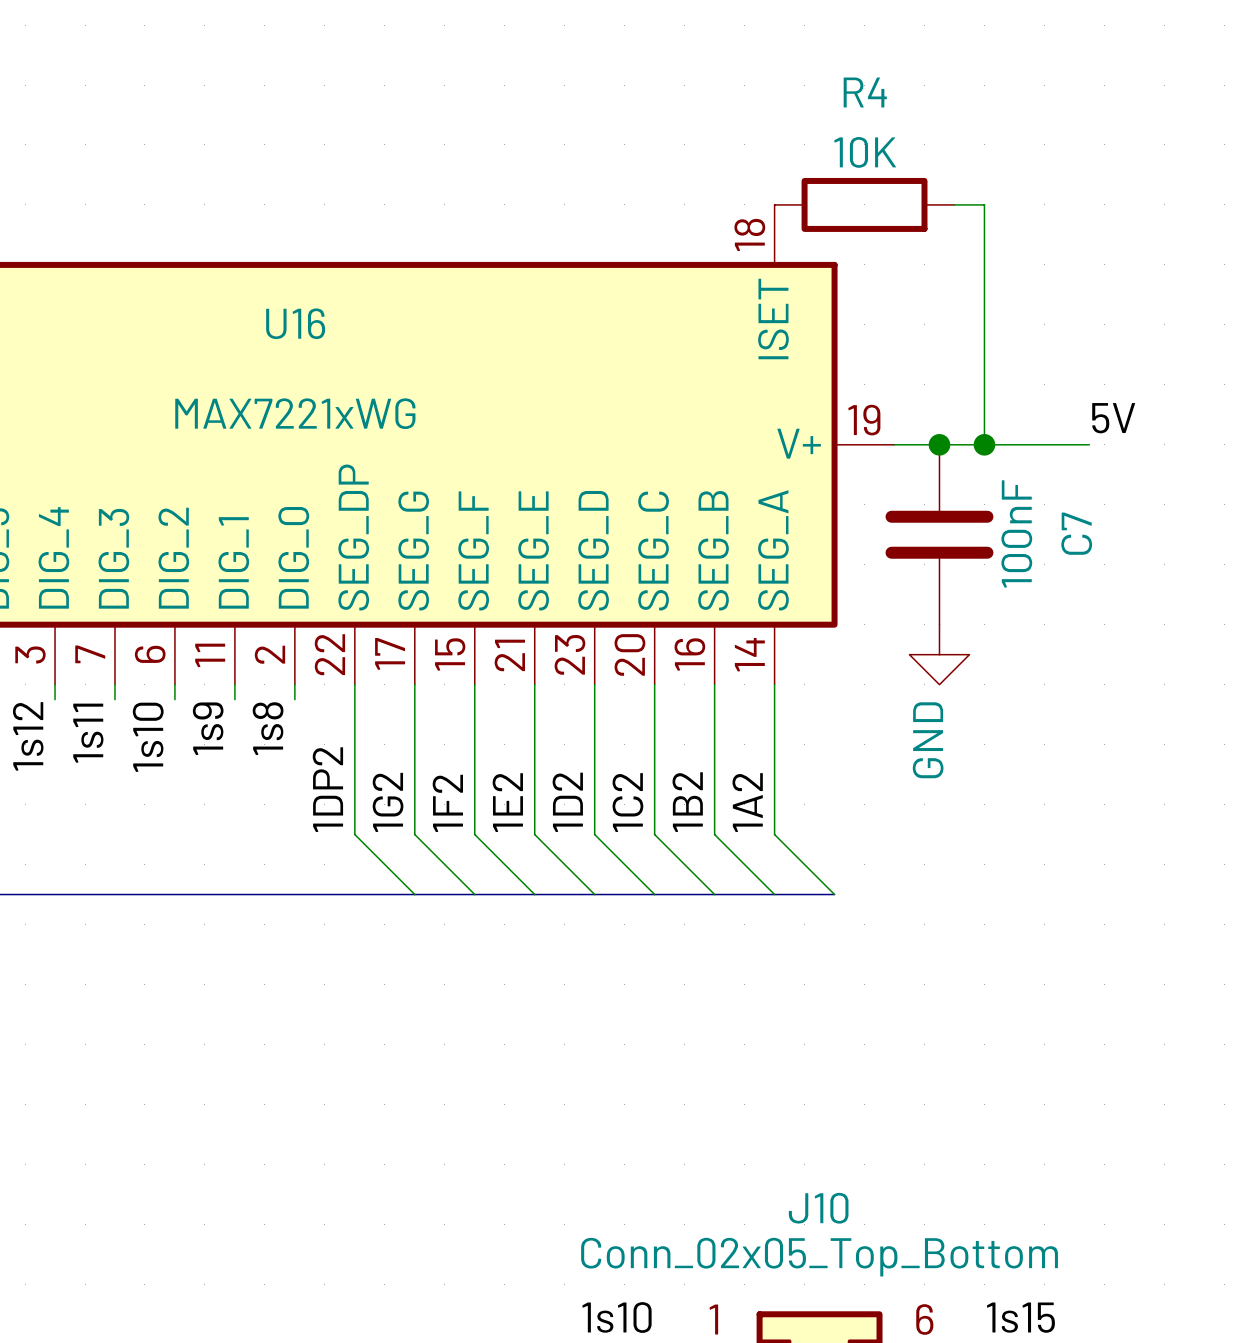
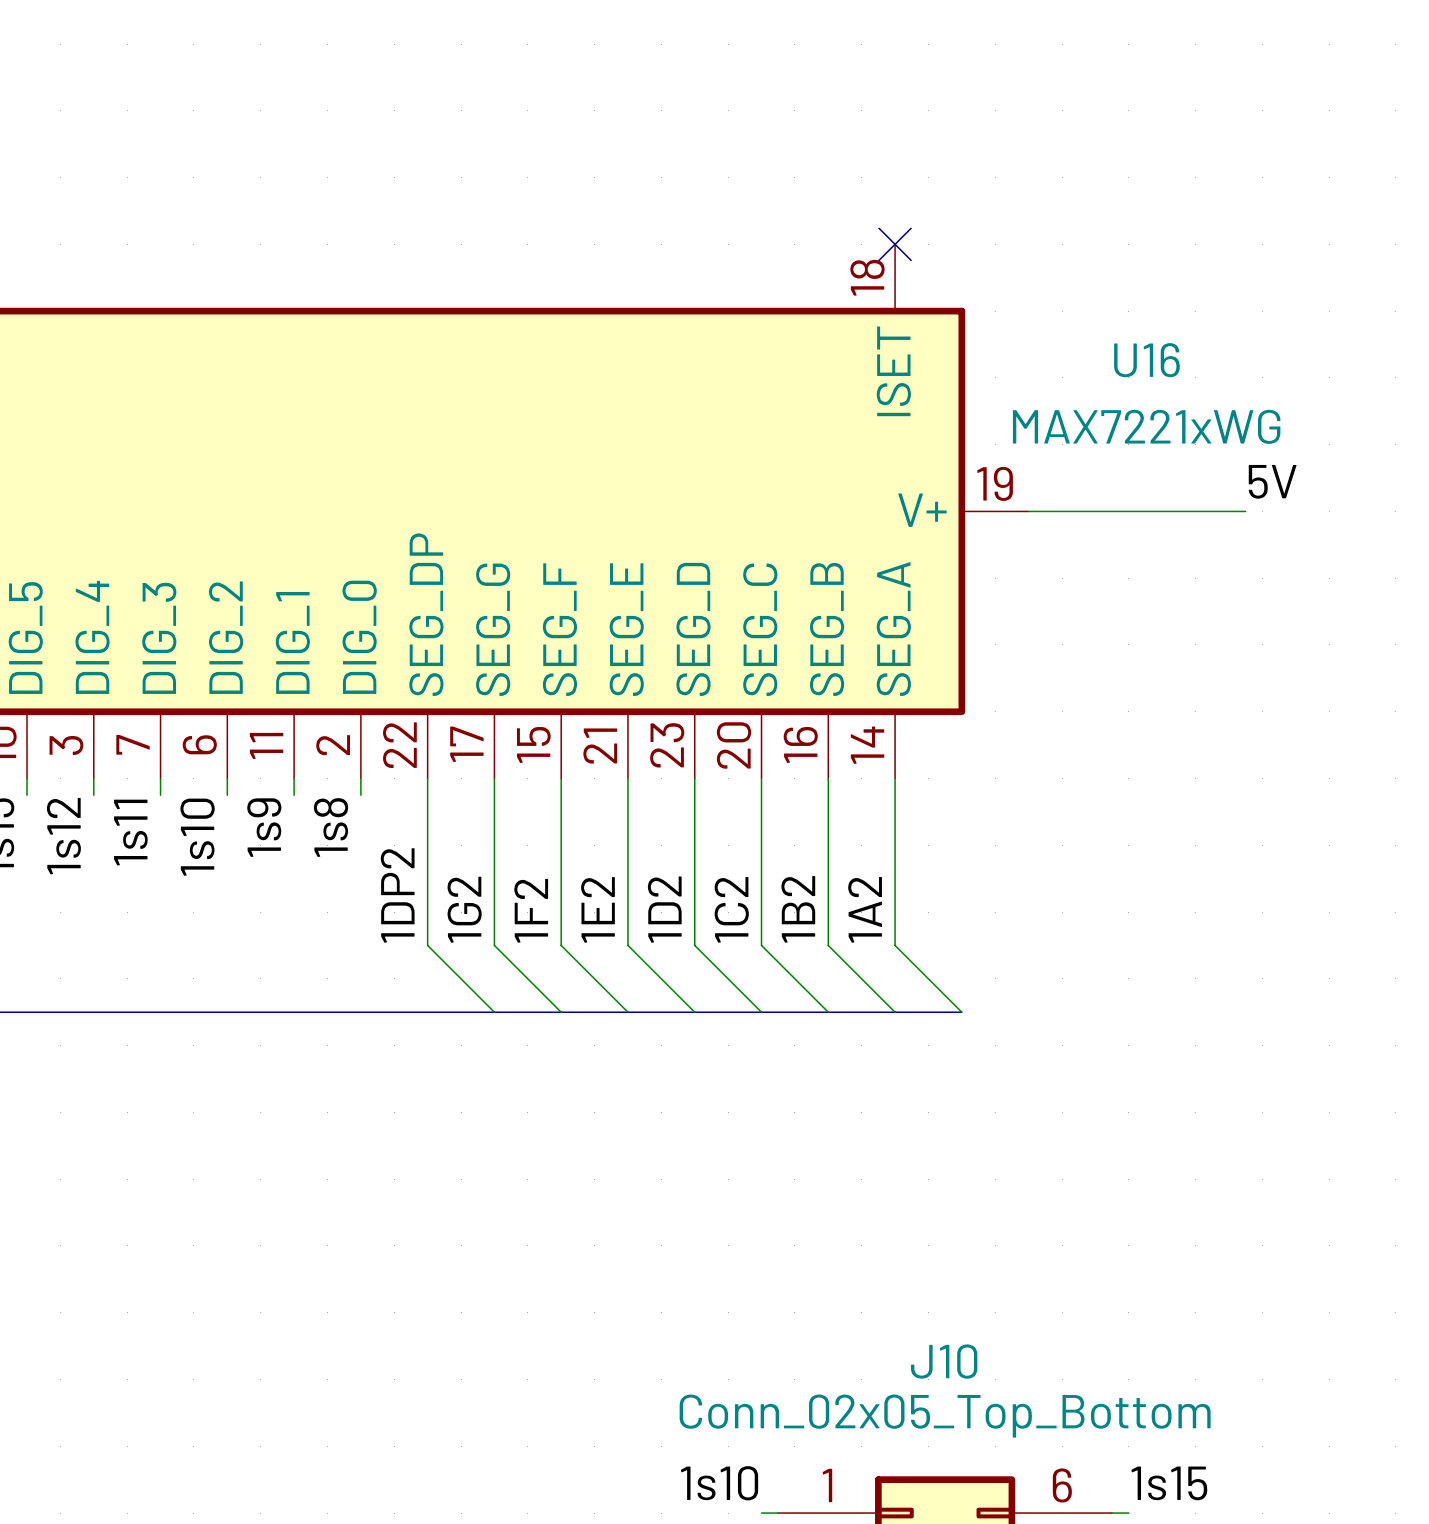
no-connect mark: none -> (895, 244)
R4: 10K (864, 204) -> none
wire: (954, 204) (984, 204) (984, 444) -> none
U16 name position: U16 (295, 323) -> U16 (1146, 360)
U16 value position: MAX7221xWG (295, 413) -> MAX7221xWG (1146, 426)
junction: (939, 444) -> none
junction: (984, 444) -> none
C7: 100nF (939, 534) -> none
power symbol: GND (939, 654) -> none

